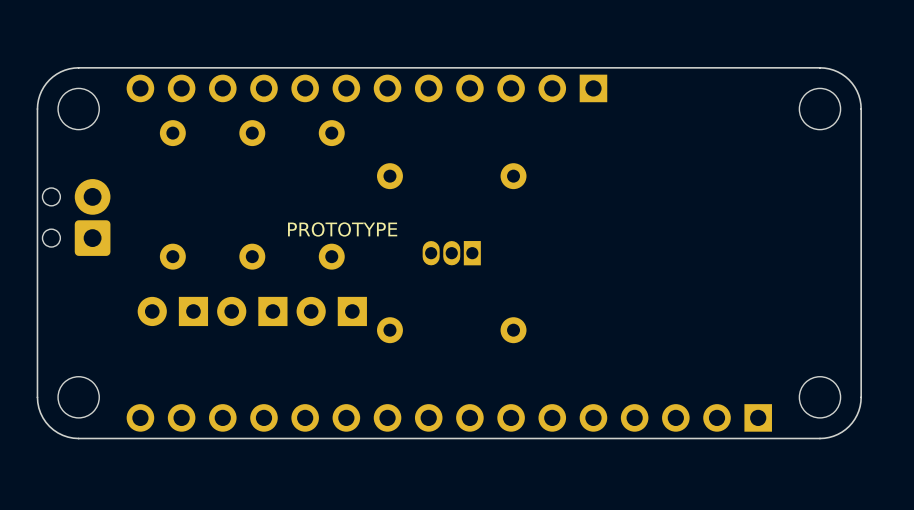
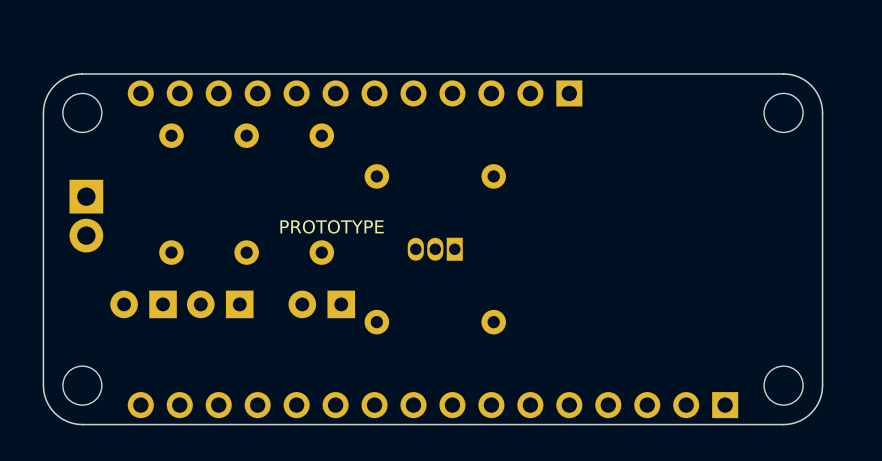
part footprint: [42, 179, 111, 256] -> [69, 179, 104, 253]
part: none -> (143, 304)
part: (172, 311) -> none
part: none -> (220, 304)
part: (252, 311) -> none

